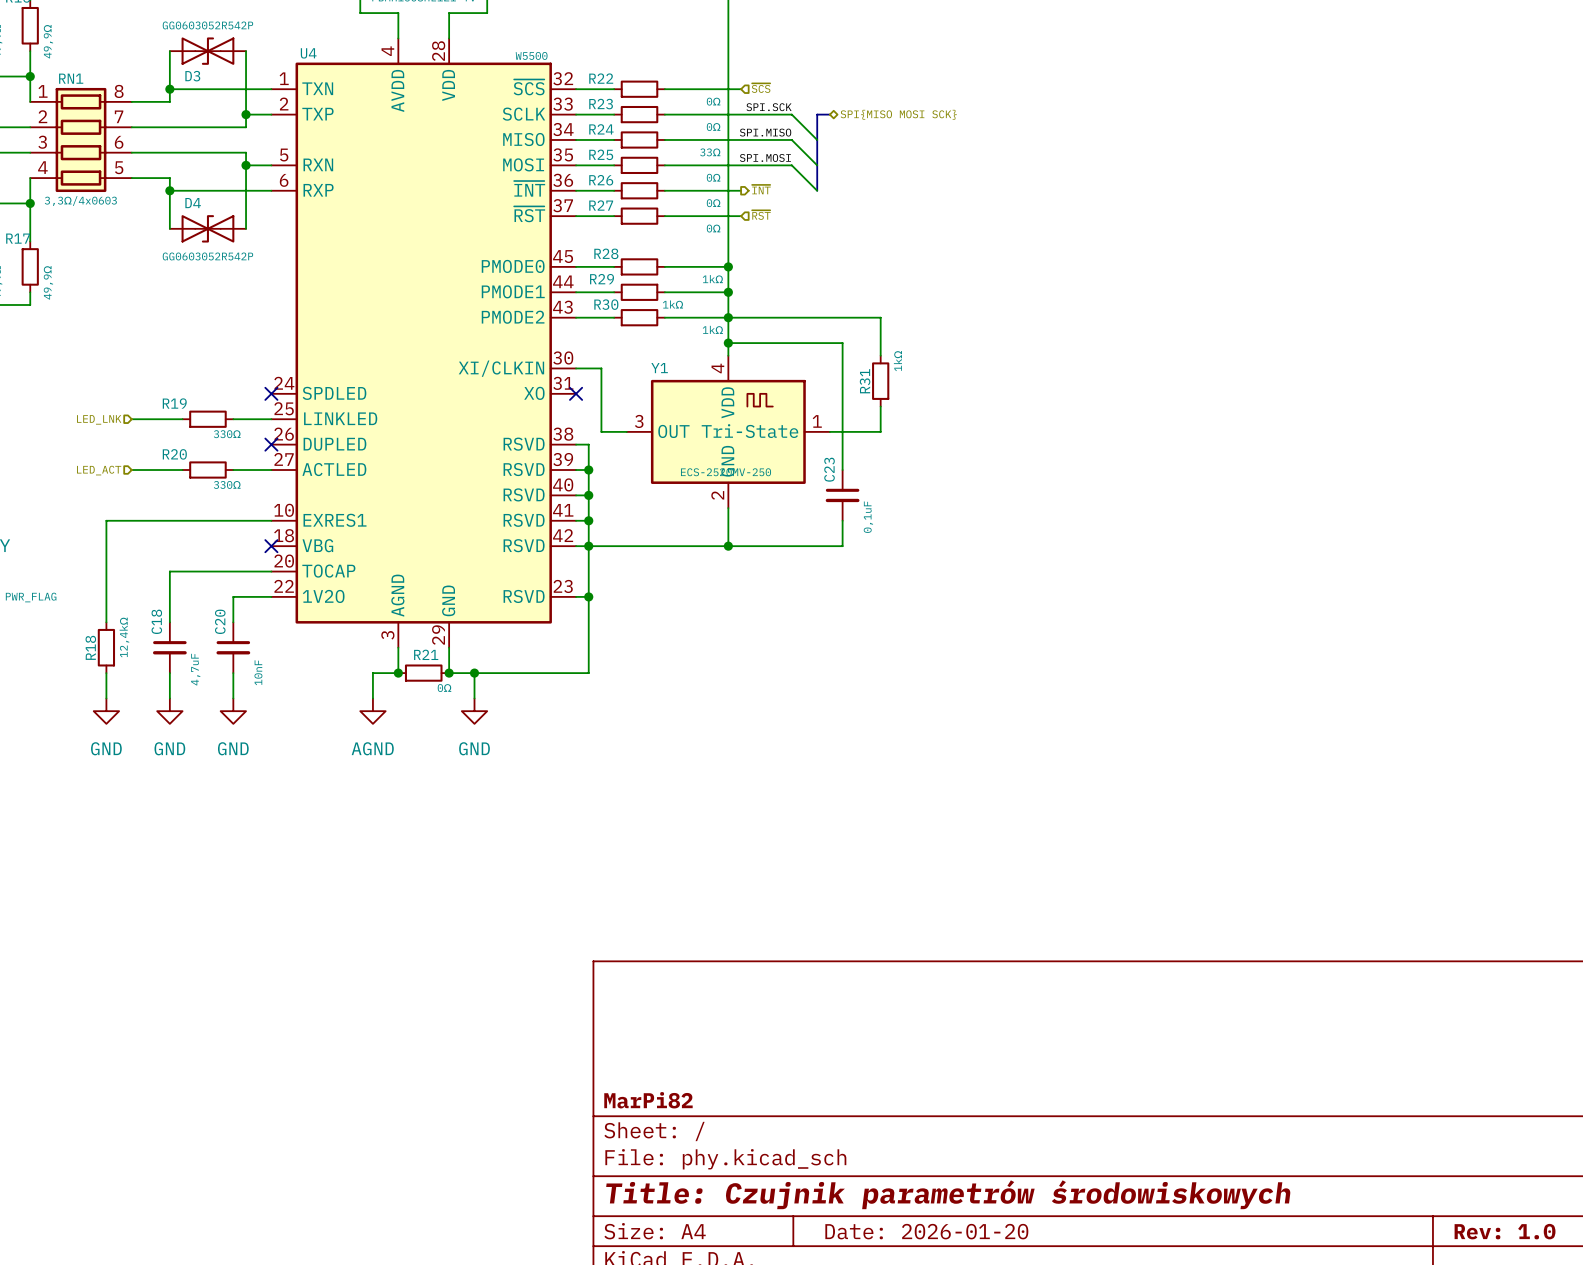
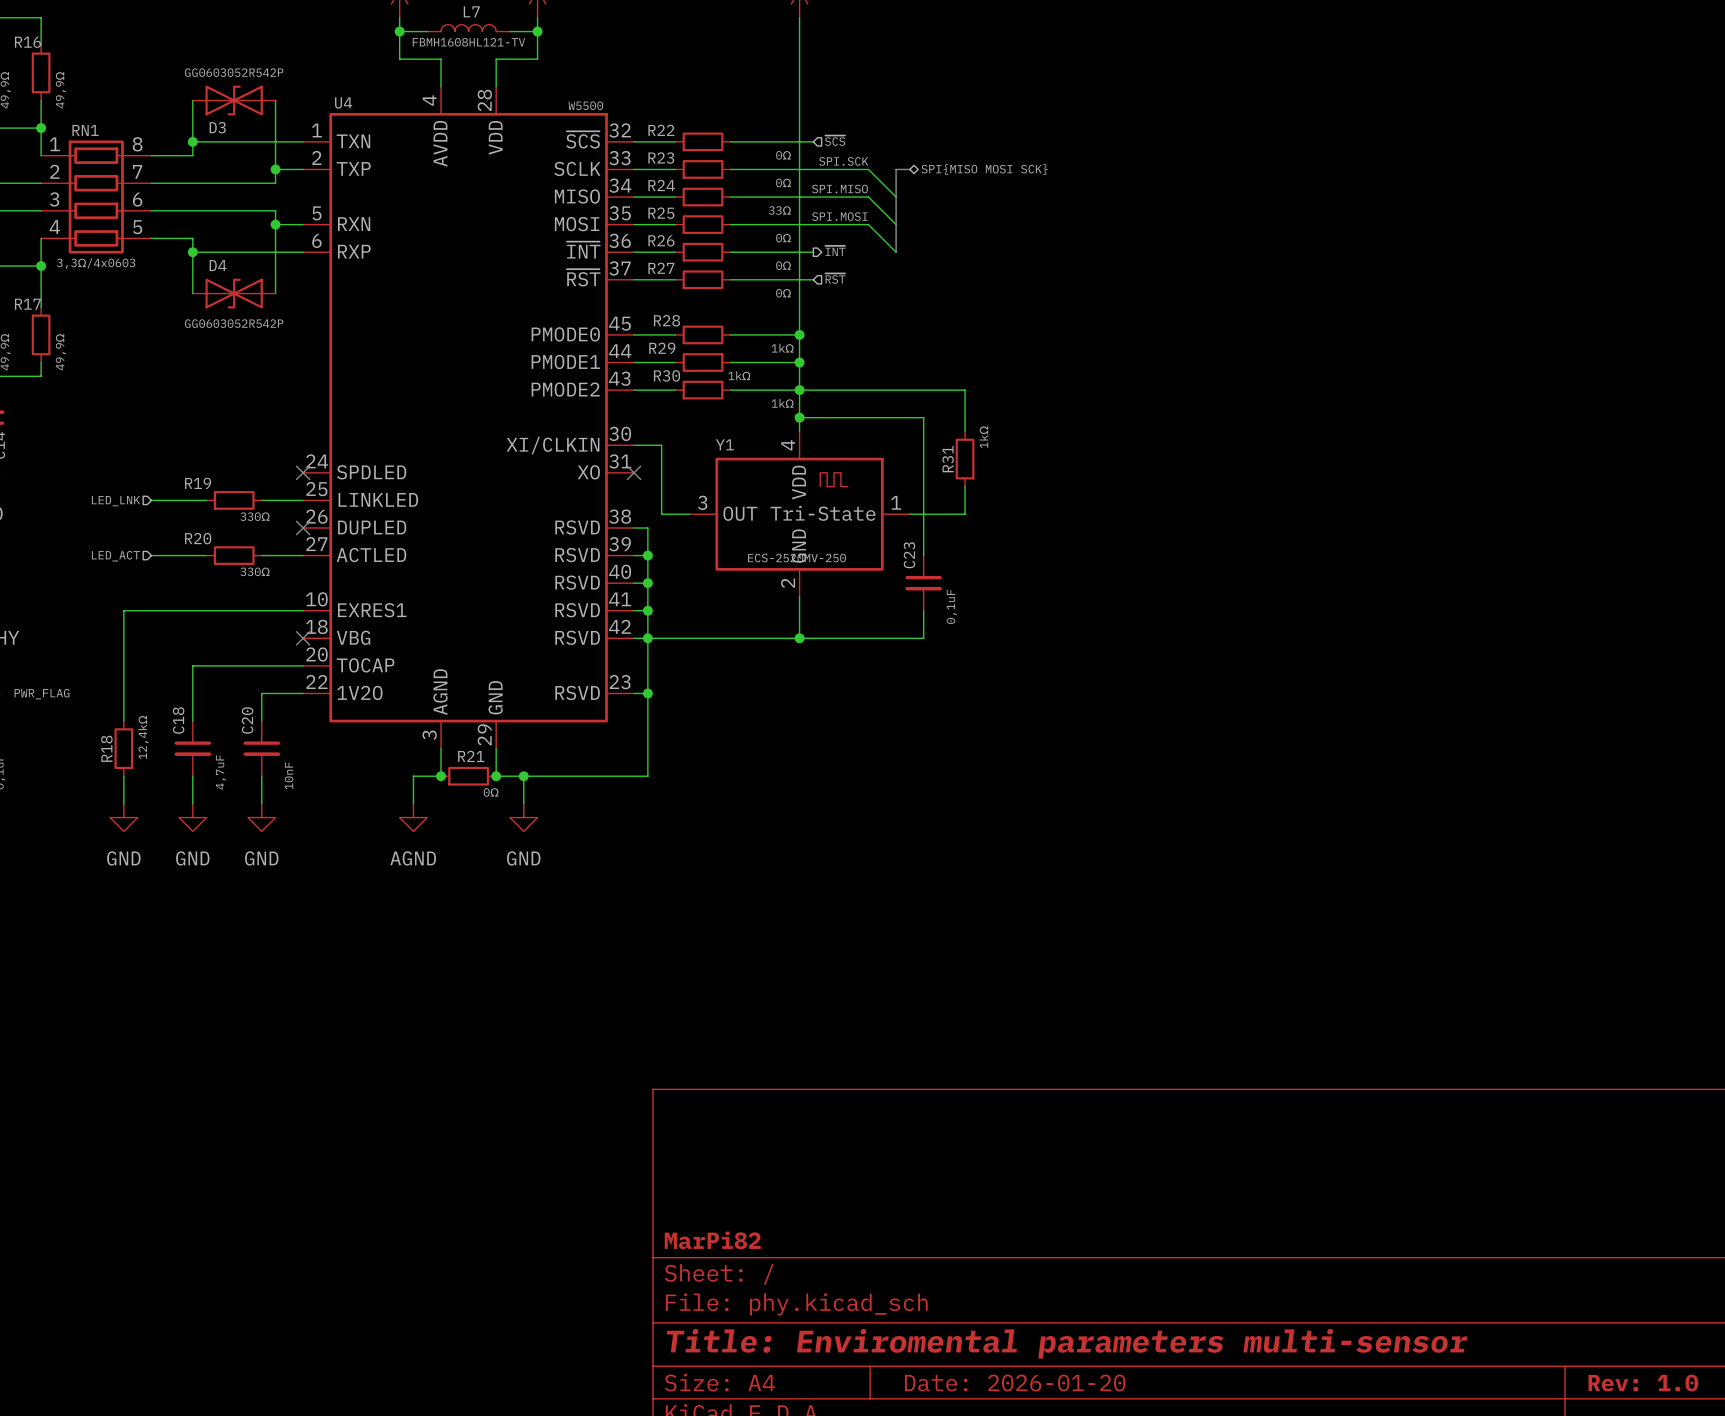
title block: Title: Czujnik parametrów środowiskowych (948, 1194) -> Title: Enviromental parameters multi-sensor (1067, 1343)

